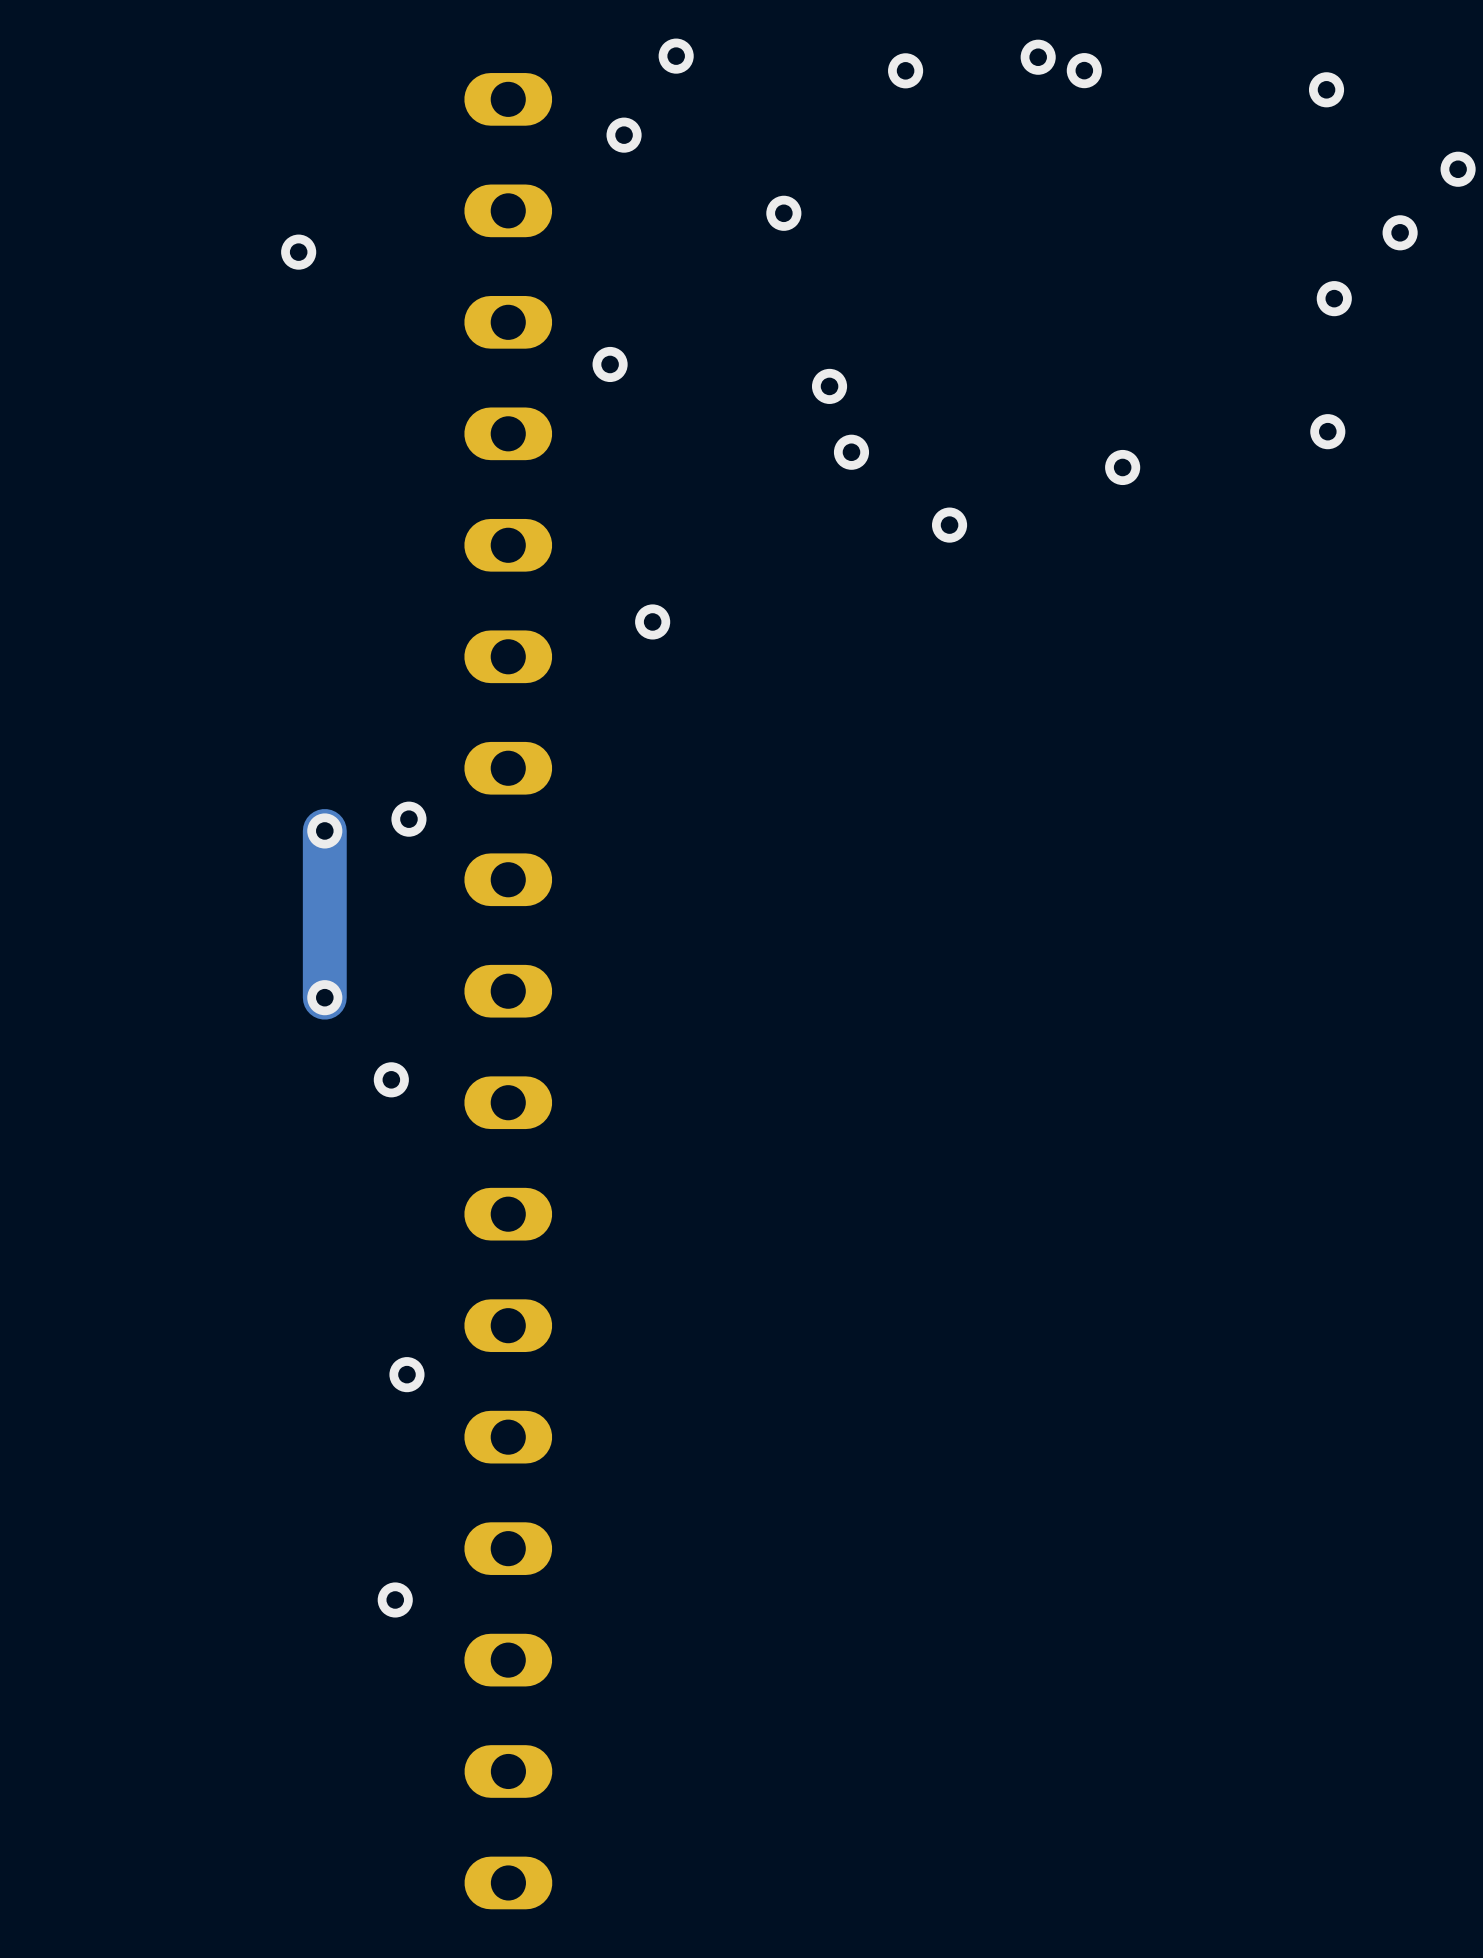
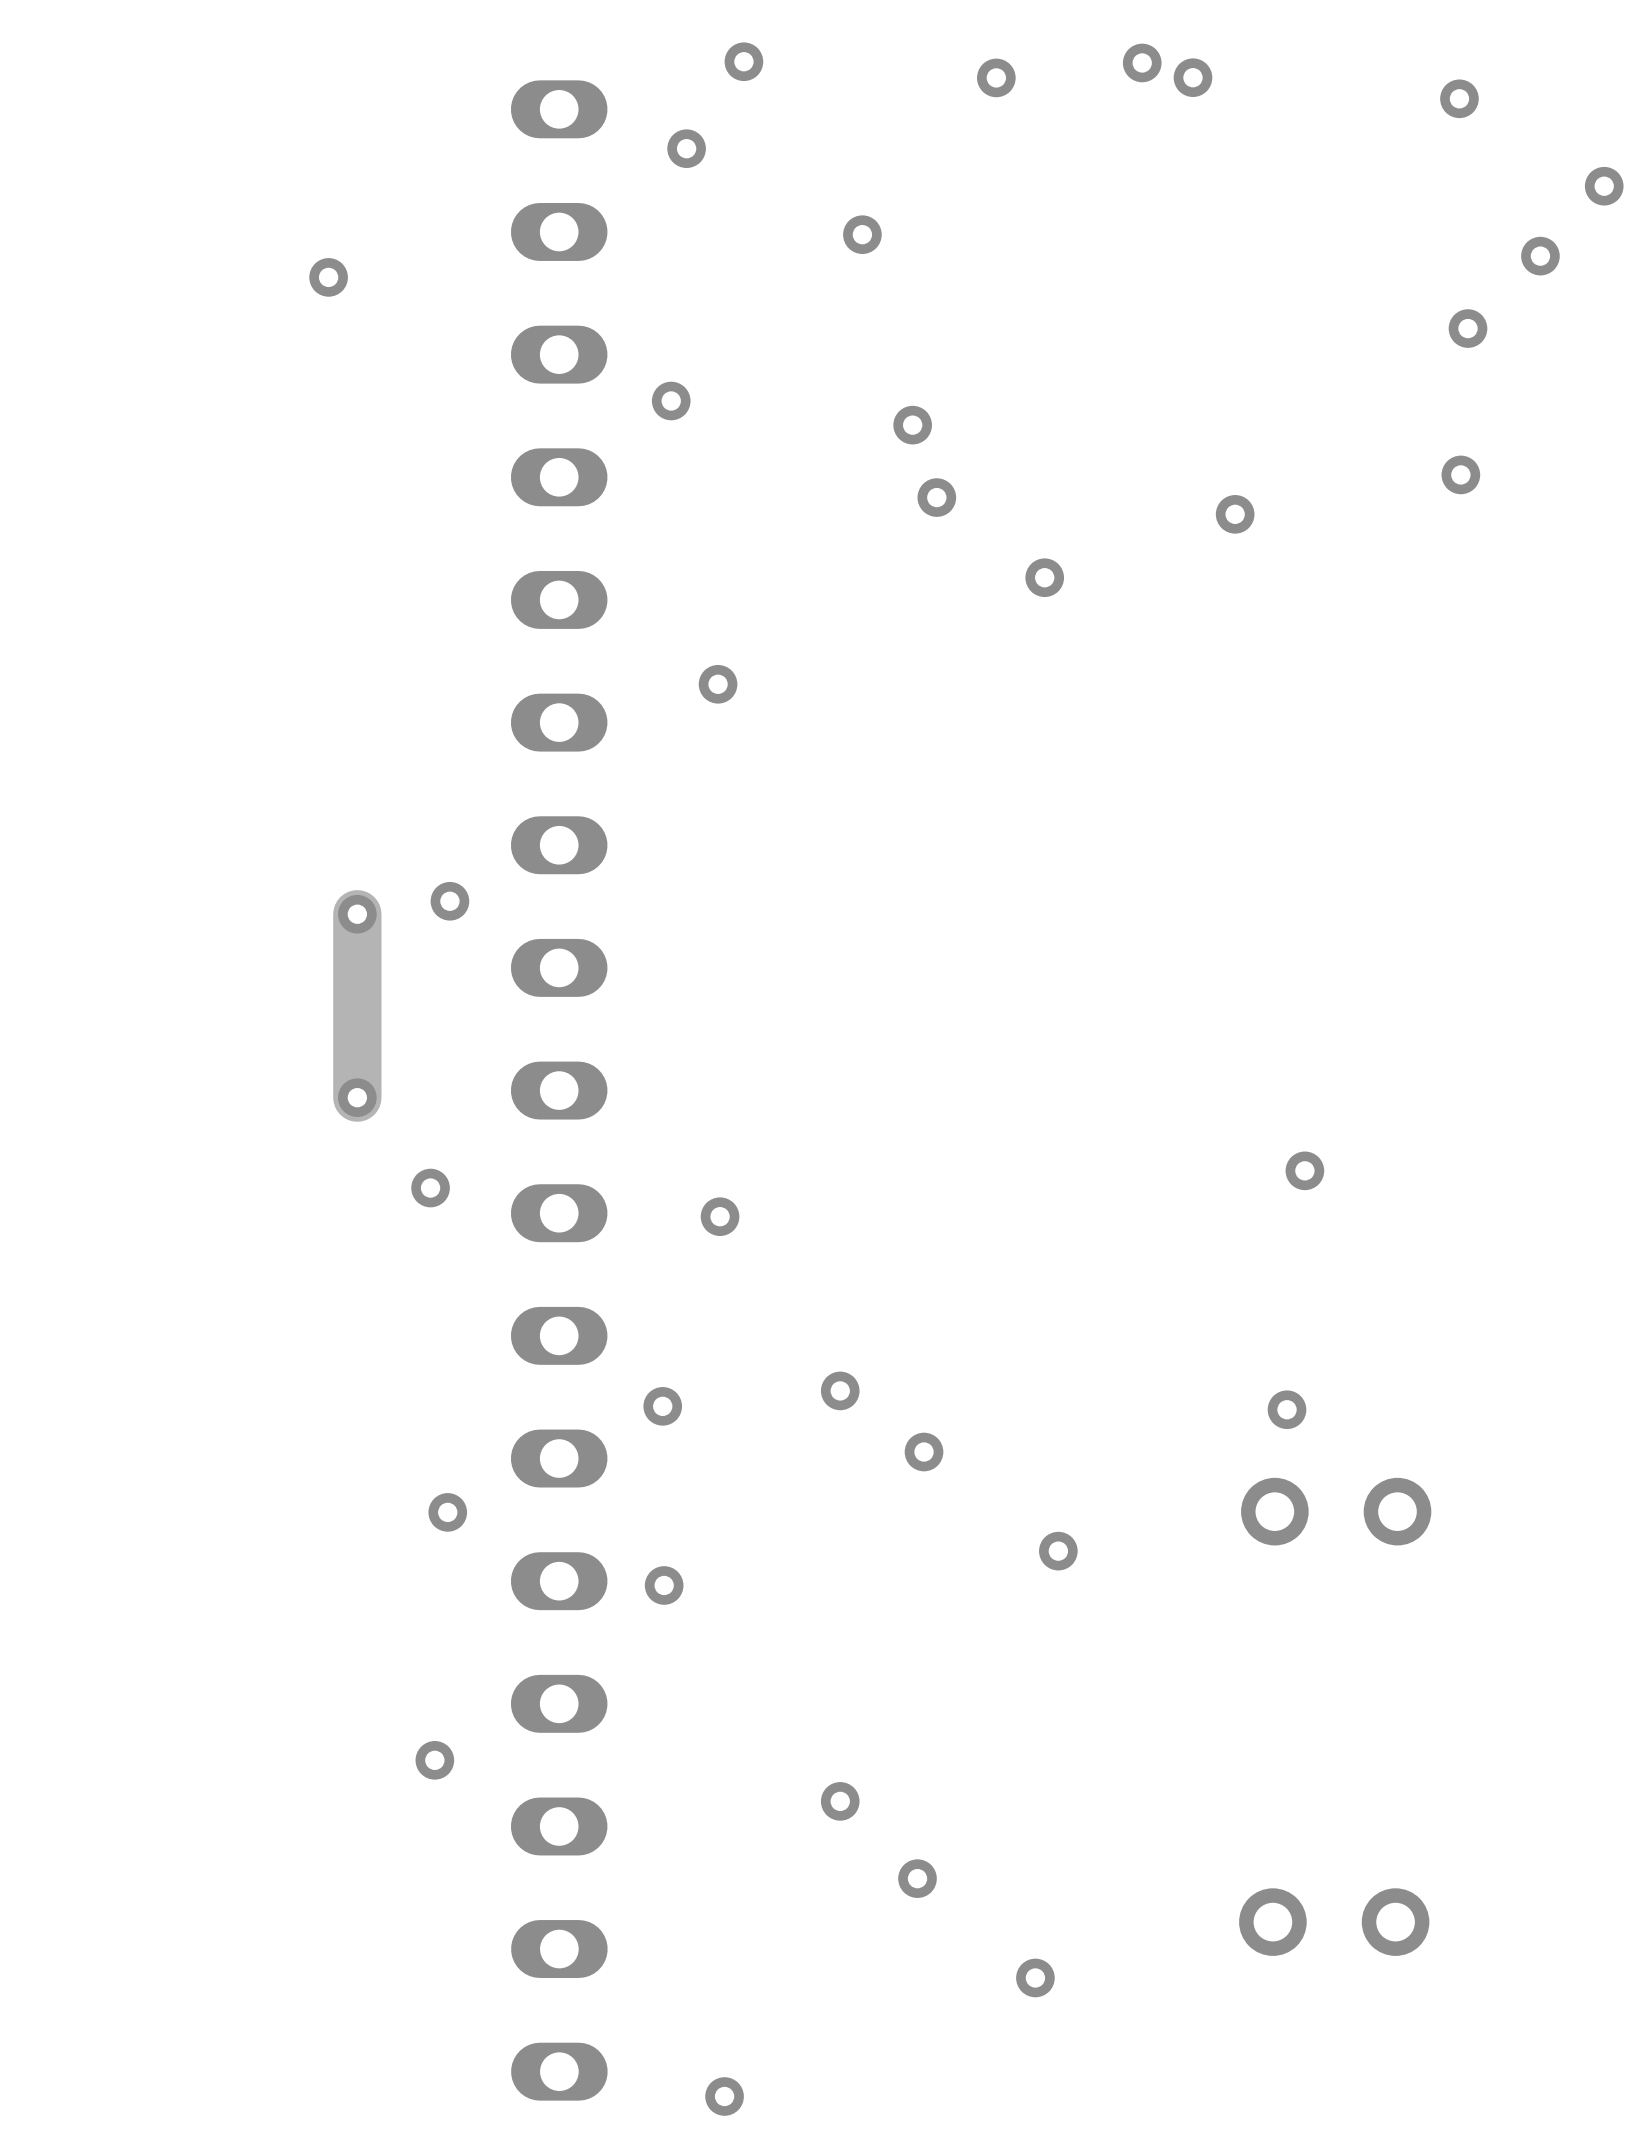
via: none -> (1304, 1170)
via: none -> (720, 1216)
via: none -> (840, 1390)
via: none -> (662, 1406)
via: none -> (1287, 1409)
via: none -> (924, 1452)
part: none -> (1336, 1511)
via: none -> (1058, 1551)
via: none -> (664, 1585)
via: none -> (840, 1801)
via: none -> (917, 1878)
part: none -> (1334, 1922)
via: none -> (1035, 1977)
via: none -> (724, 2096)

